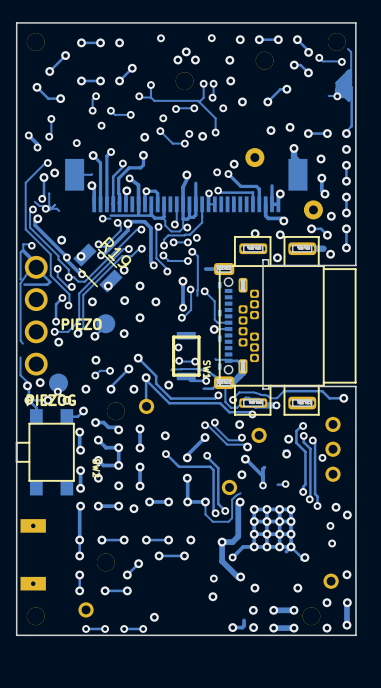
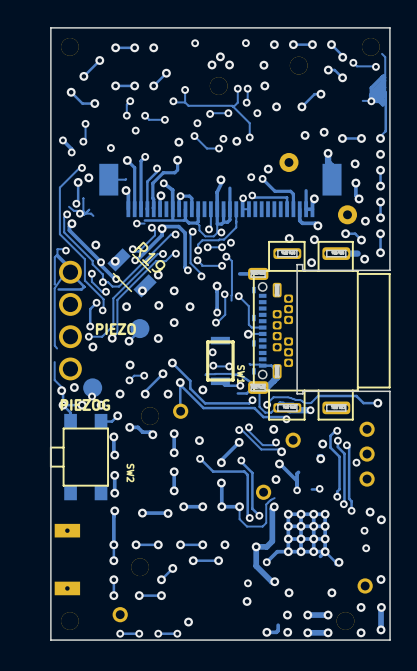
track: (98, 440) (105, 447) (118, 447) (118, 465) (103, 465) (98, 460) -> none
via: (98, 440) -> none
via: (118, 447) -> none
via: (98, 460) -> none
via: (118, 465) -> none
via: (98, 478) -> none
via: (118, 485) -> none
via: (98, 506) -> none
track: (118, 506) (98, 506) -> none
via: (118, 506) -> none
via: none -> (142, 513)
track: none -> (164, 513) (142, 513)

